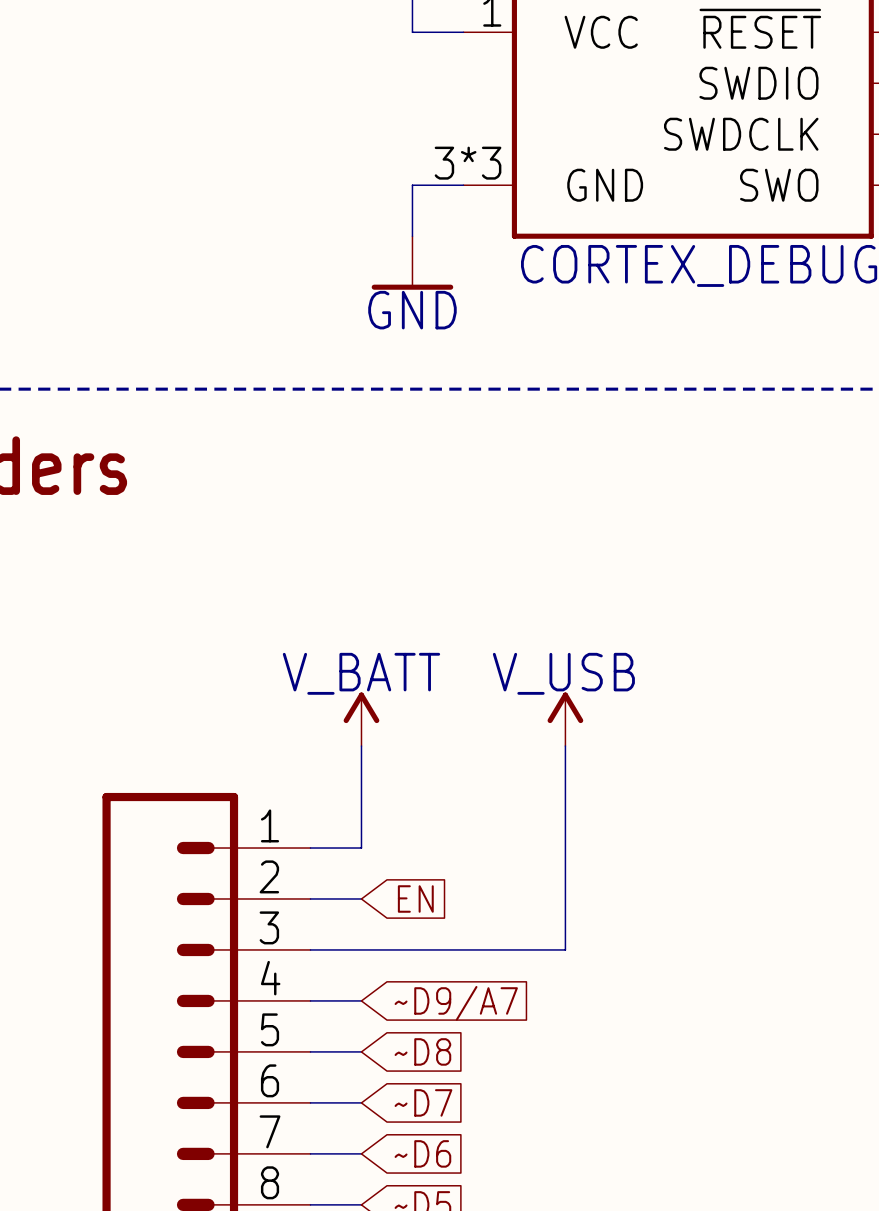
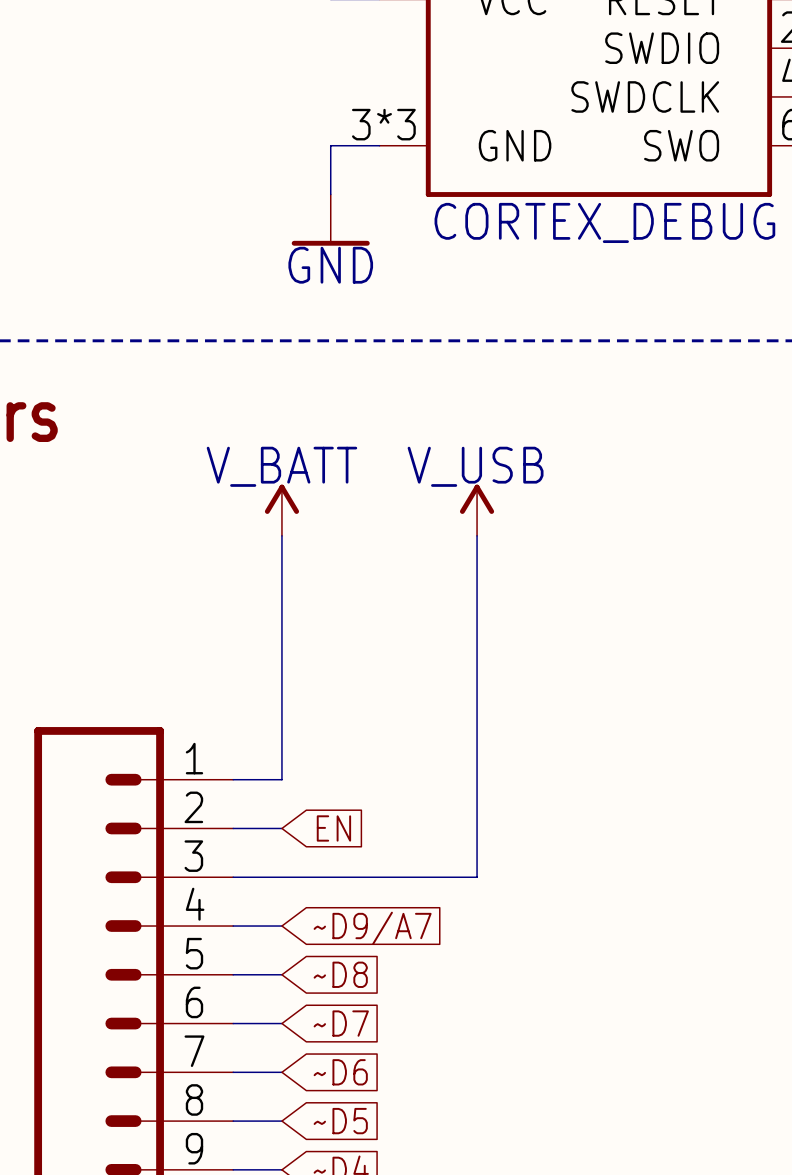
wire: none -> (281, 535) (281, 682)
wire: none -> (477, 535) (477, 682)
power symbol position: V_BATT (361, 719) -> V_BATT (281, 510)
power symbol position: V_USB (565, 719) -> V_USB (477, 510)

